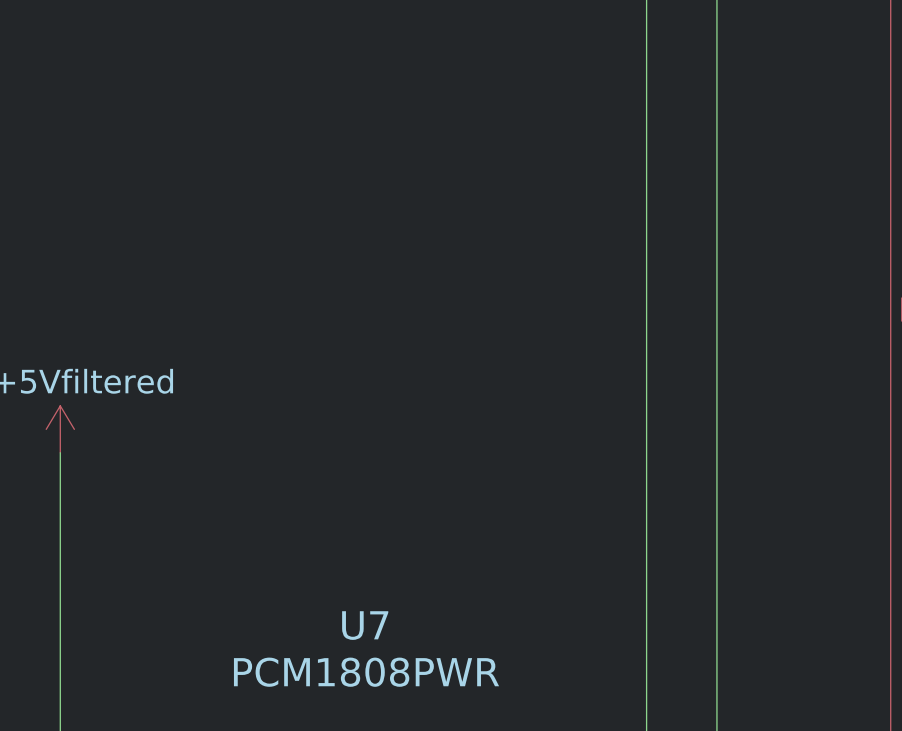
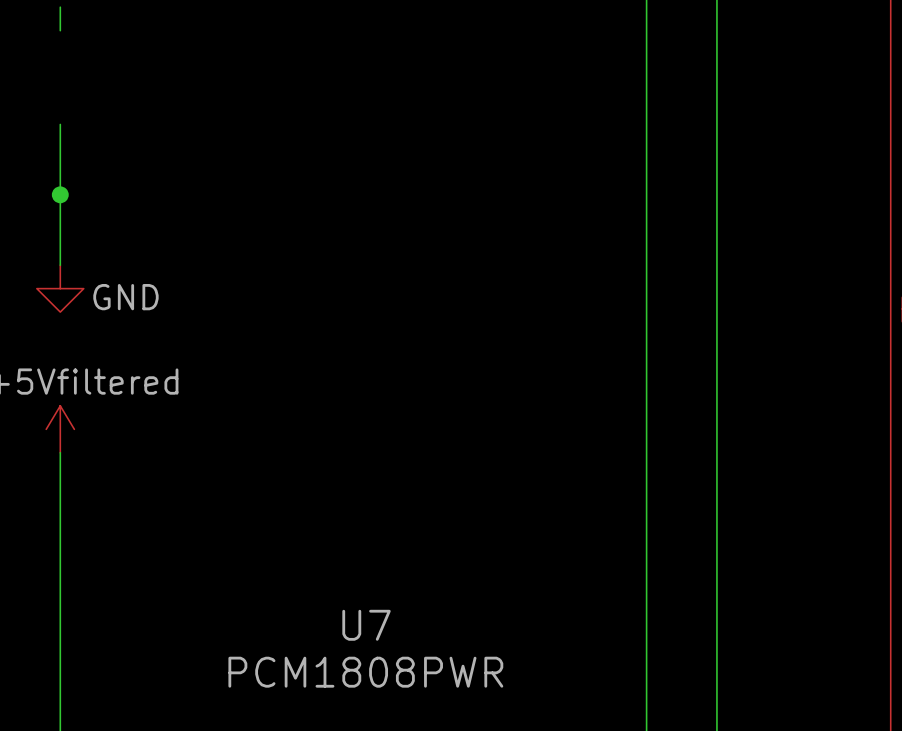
wire: none -> (60, 7) (60, 30)
wire: none -> (60, 124) (60, 265)
junction: none -> (60, 194)
power symbol: none -> GND (60, 288)

